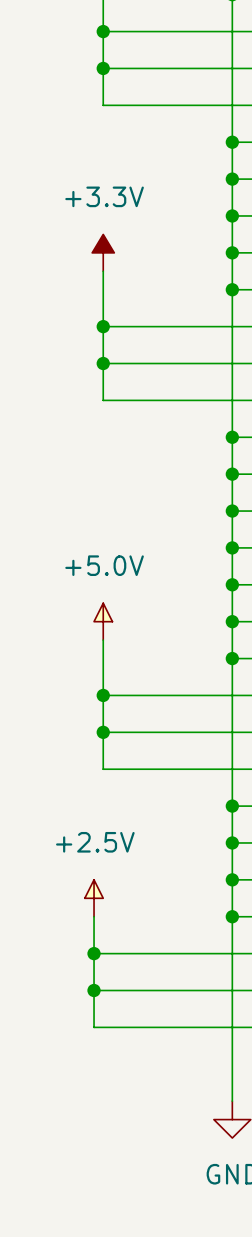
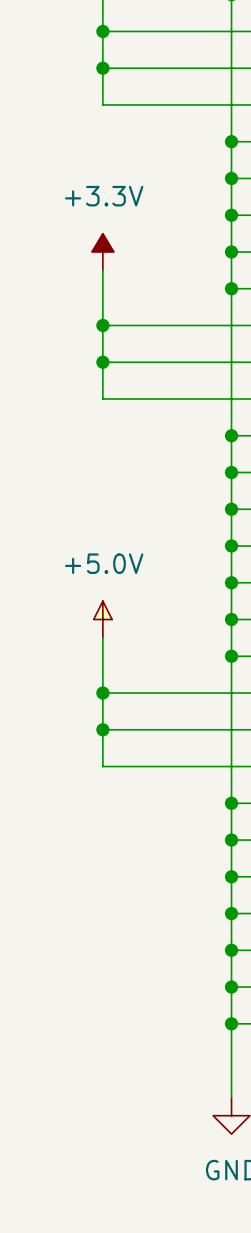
power symbol: +2.5V (94, 898) -> none
wire: (94, 916) (94, 1027) (232, 1027) -> none
wire: (94, 953) (232, 953) -> none
junction: (94, 953) -> none
junction: none -> (231, 950)
wire: (94, 990) (232, 990) -> none
junction: (94, 990) -> none
junction: none -> (231, 987)
junction: none -> (231, 1023)

